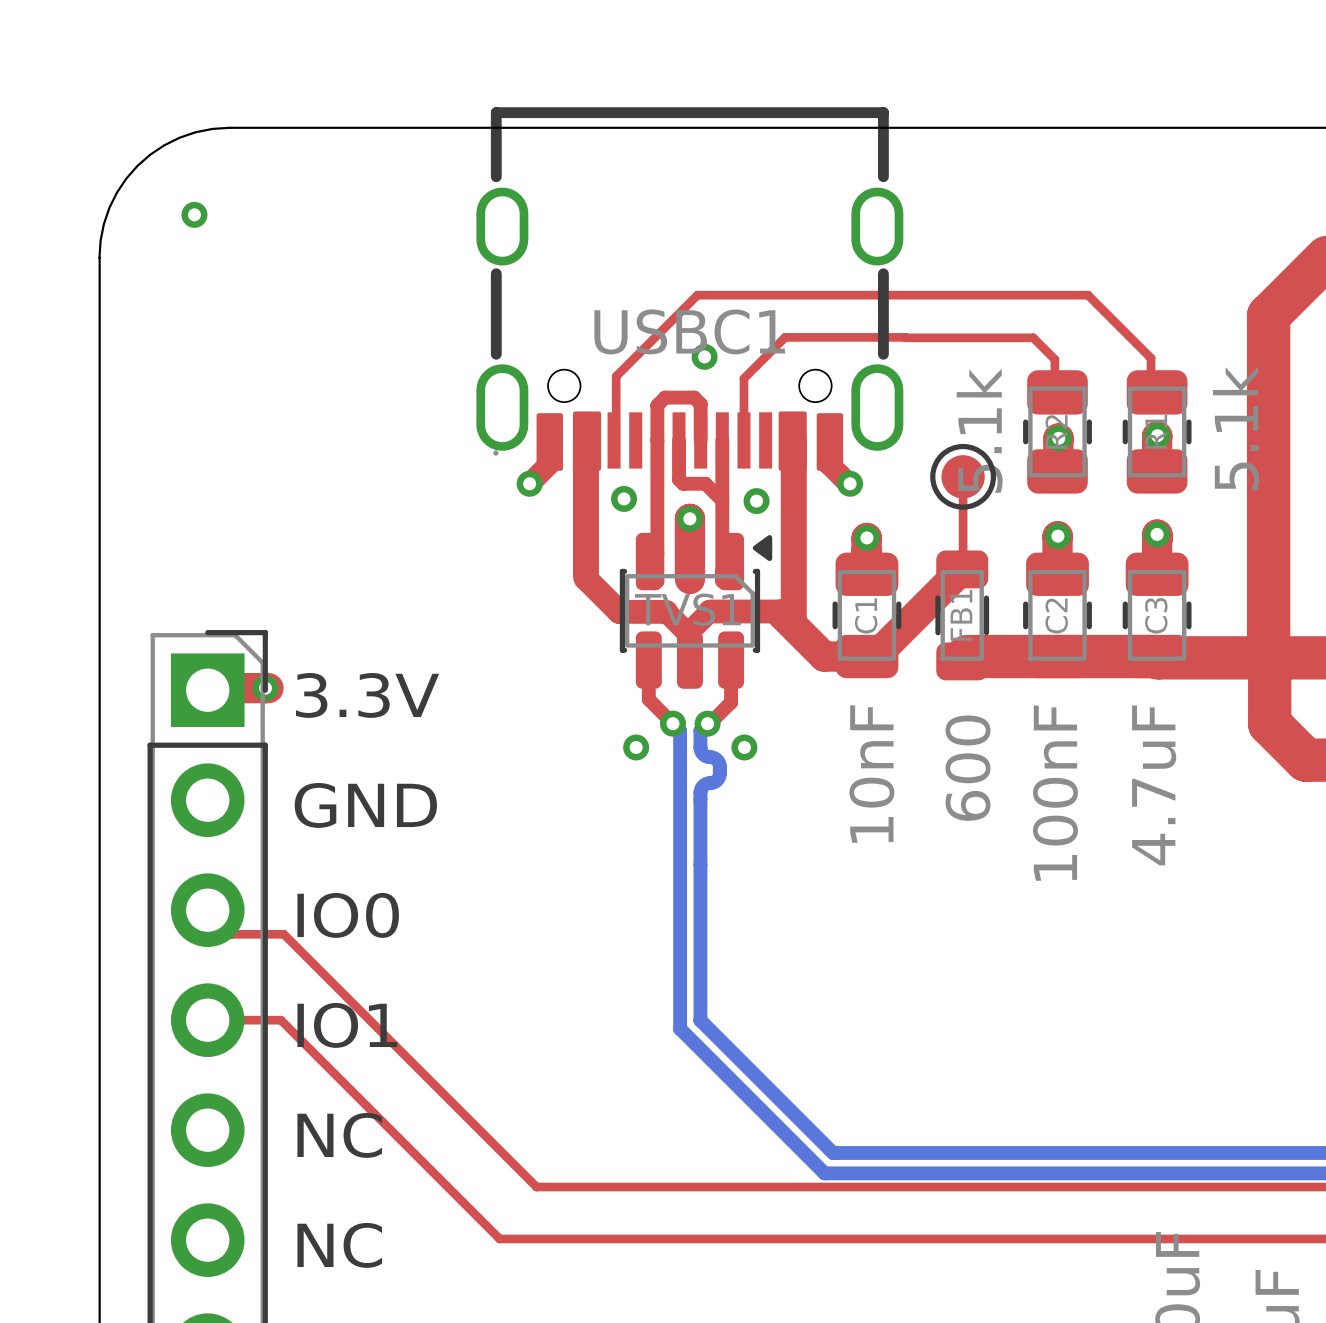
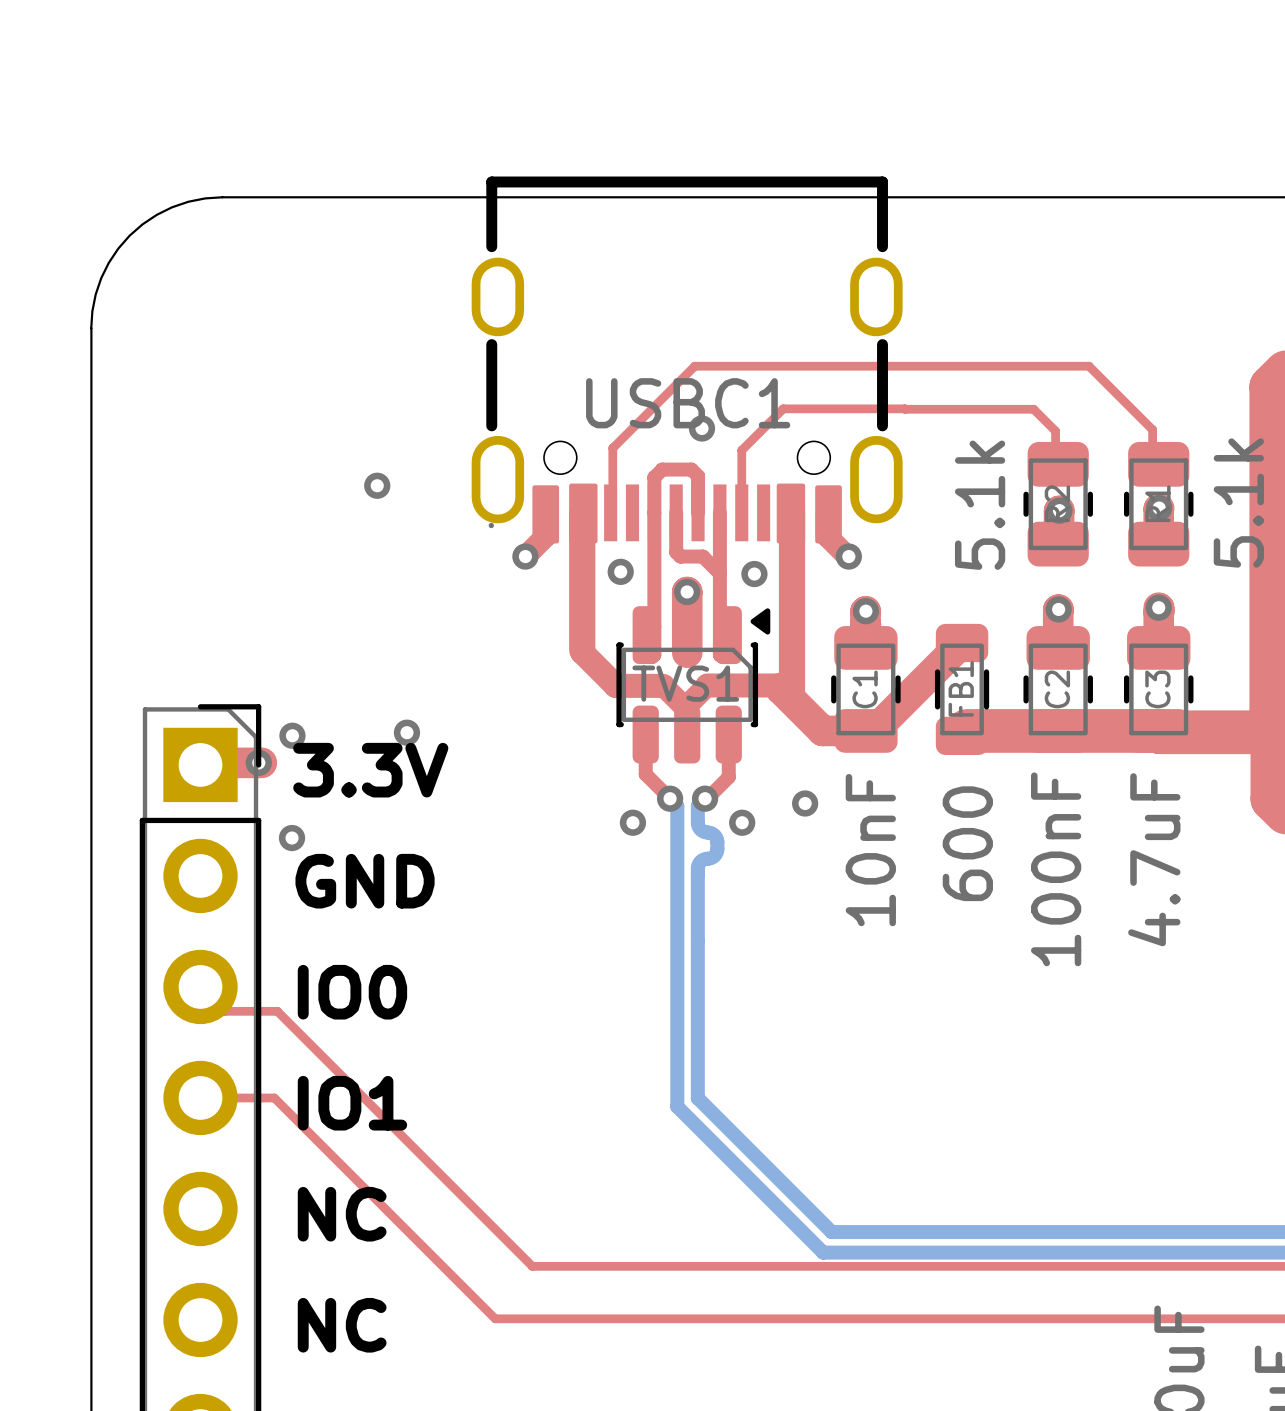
via: (194, 214) -> none
via: none -> (377, 485)
top track: (963, 476) (962, 569) -> none
part: (963, 476) -> none
via: none -> (406, 732)
via: none -> (292, 735)
via: none -> (805, 803)
via: none -> (292, 838)

